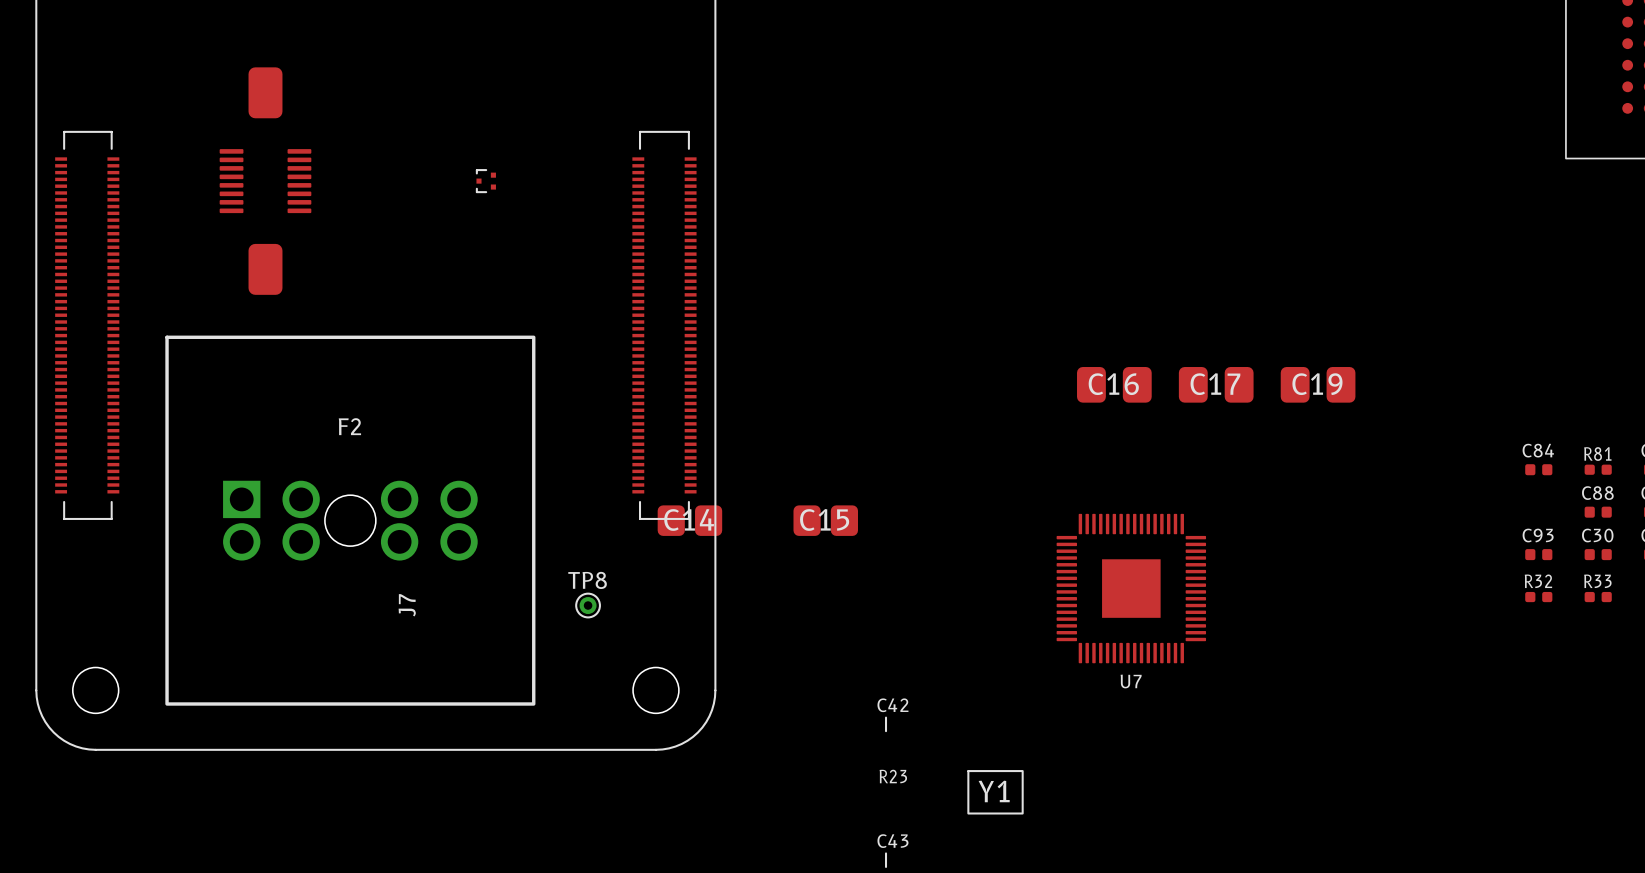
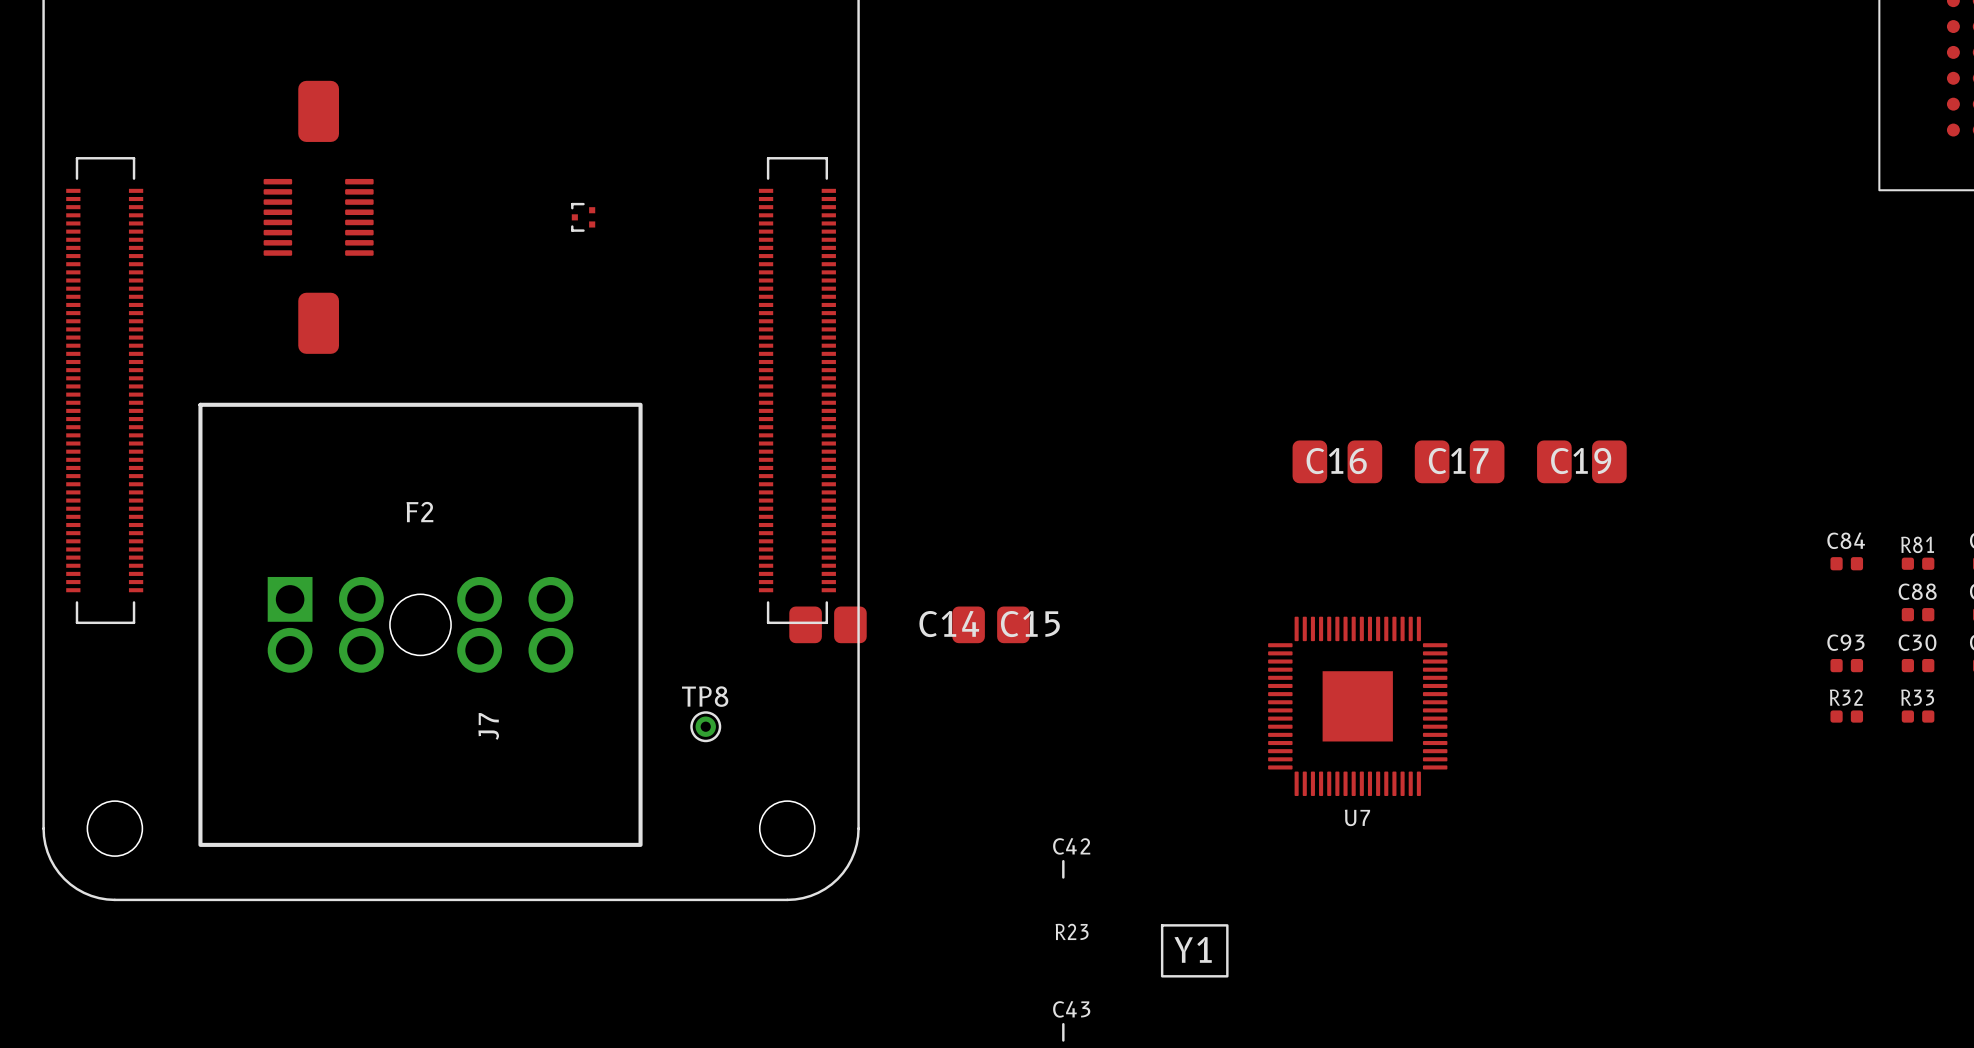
C14 name position: C14 (689, 519) -> C14 (949, 624)
C15 name position: C15 (824, 519) -> C15 (1030, 624)

